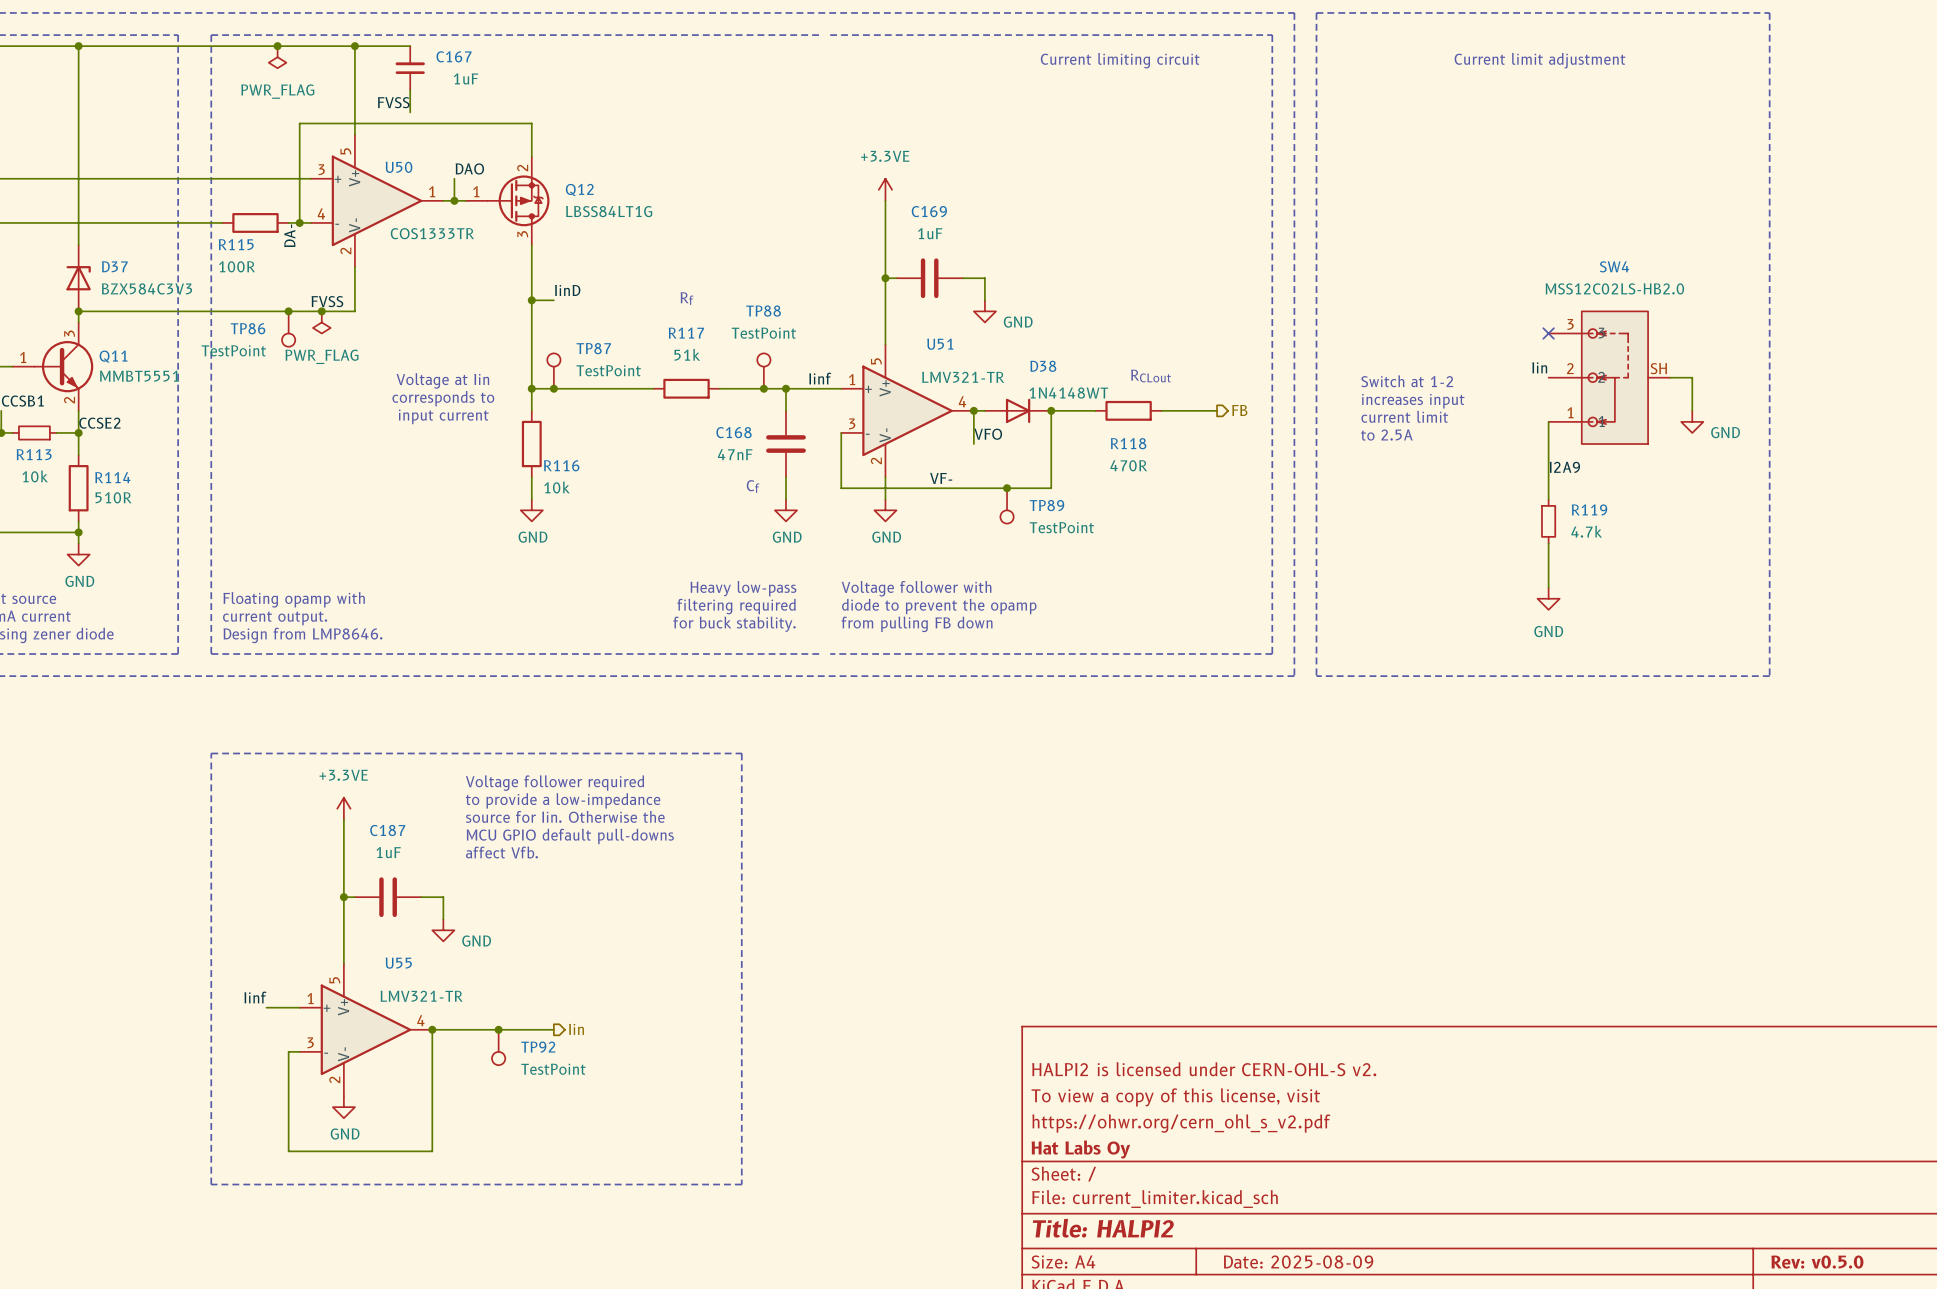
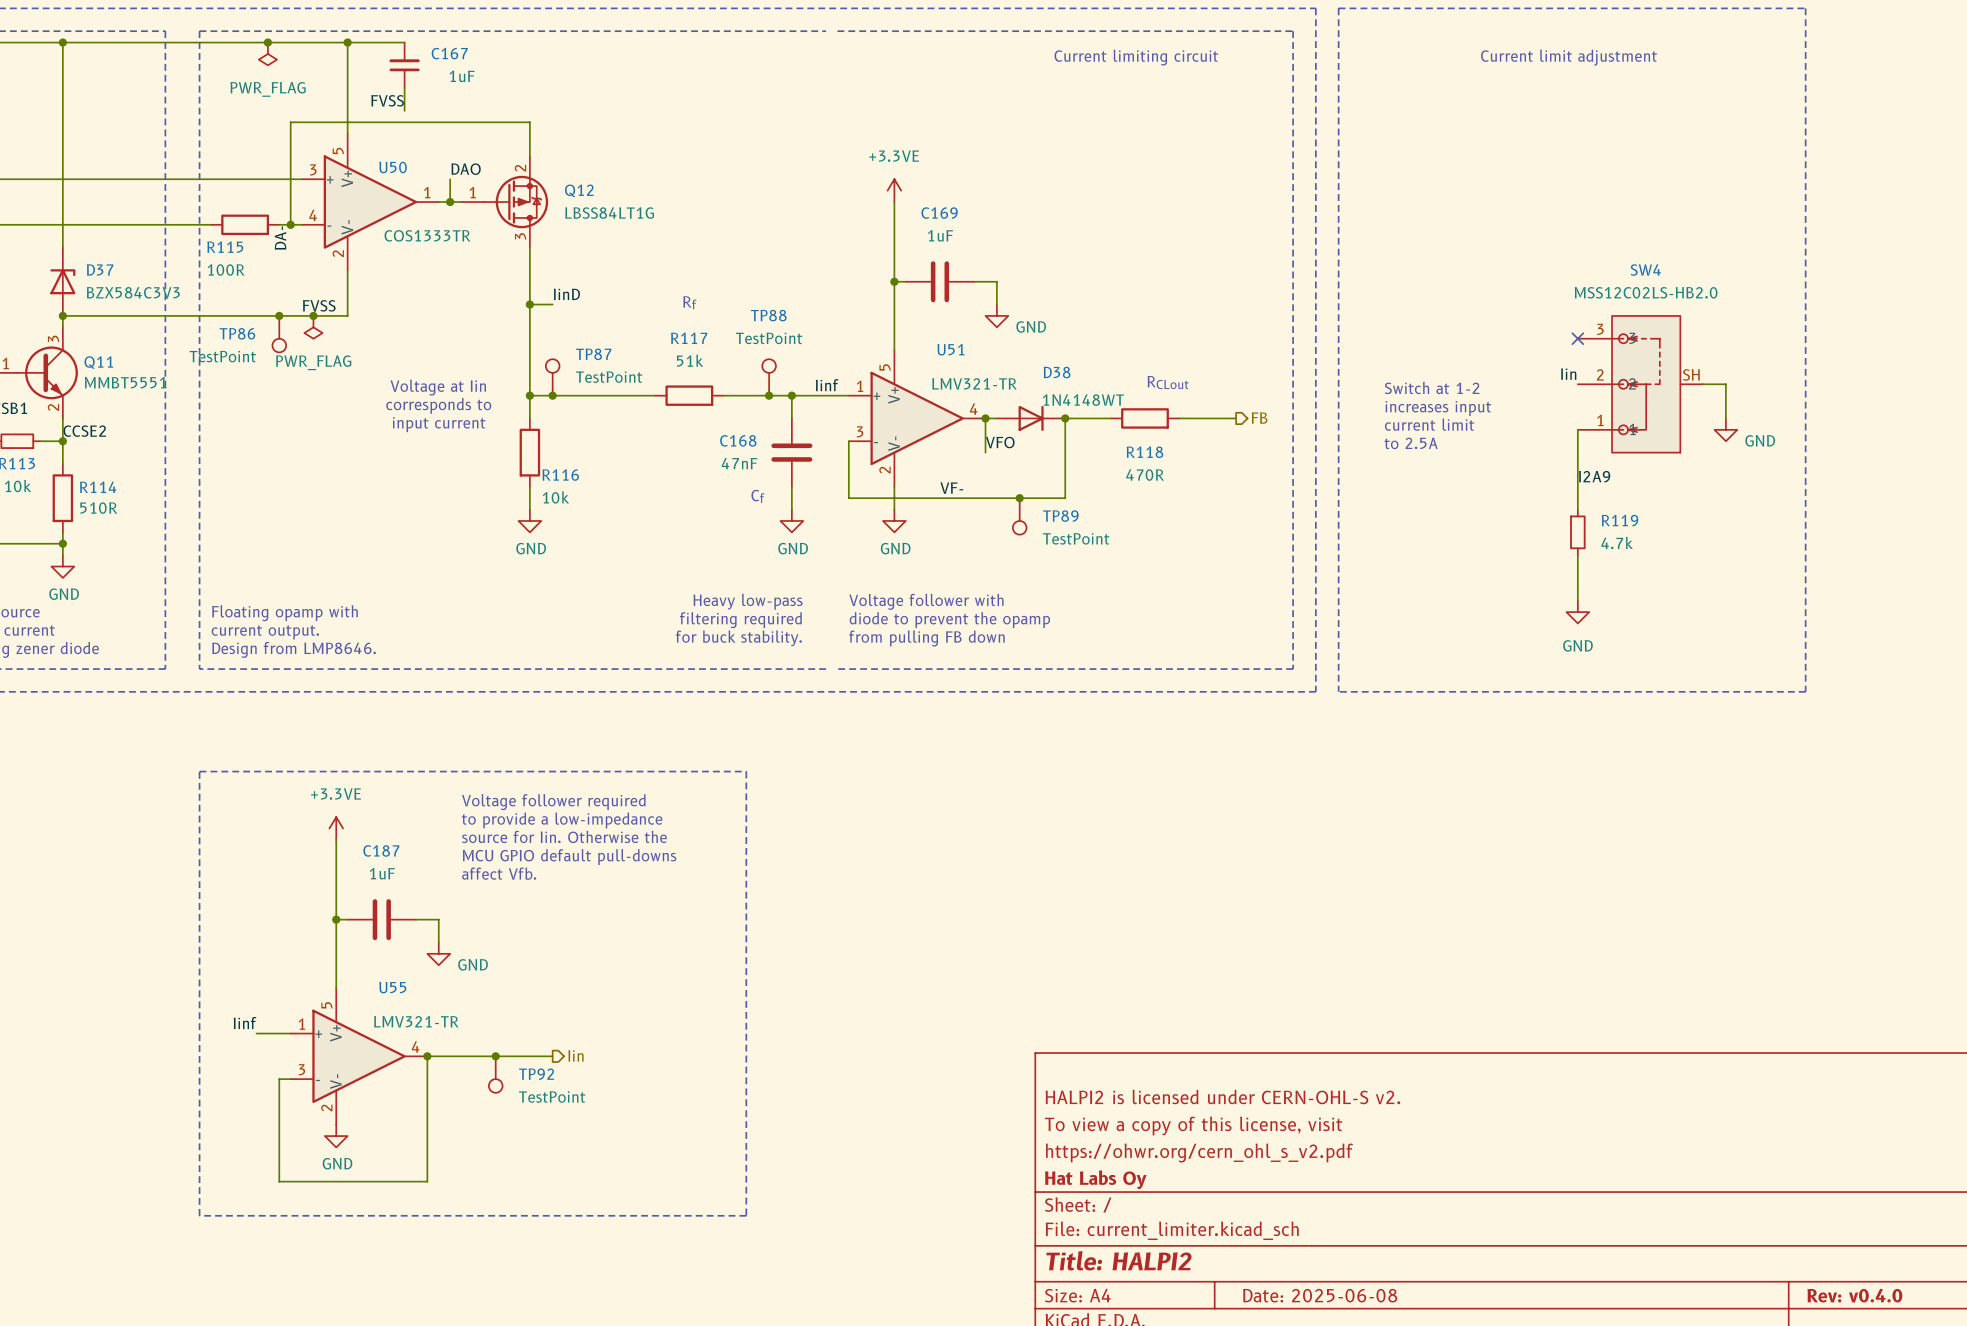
title block: Date: 2025-08-09 (1298, 1262) -> Date: 2025-06-08 (1320, 1295)
title block: Rev: v0.5.0 (1817, 1262) -> Rev: v0.4.0 (1854, 1295)

